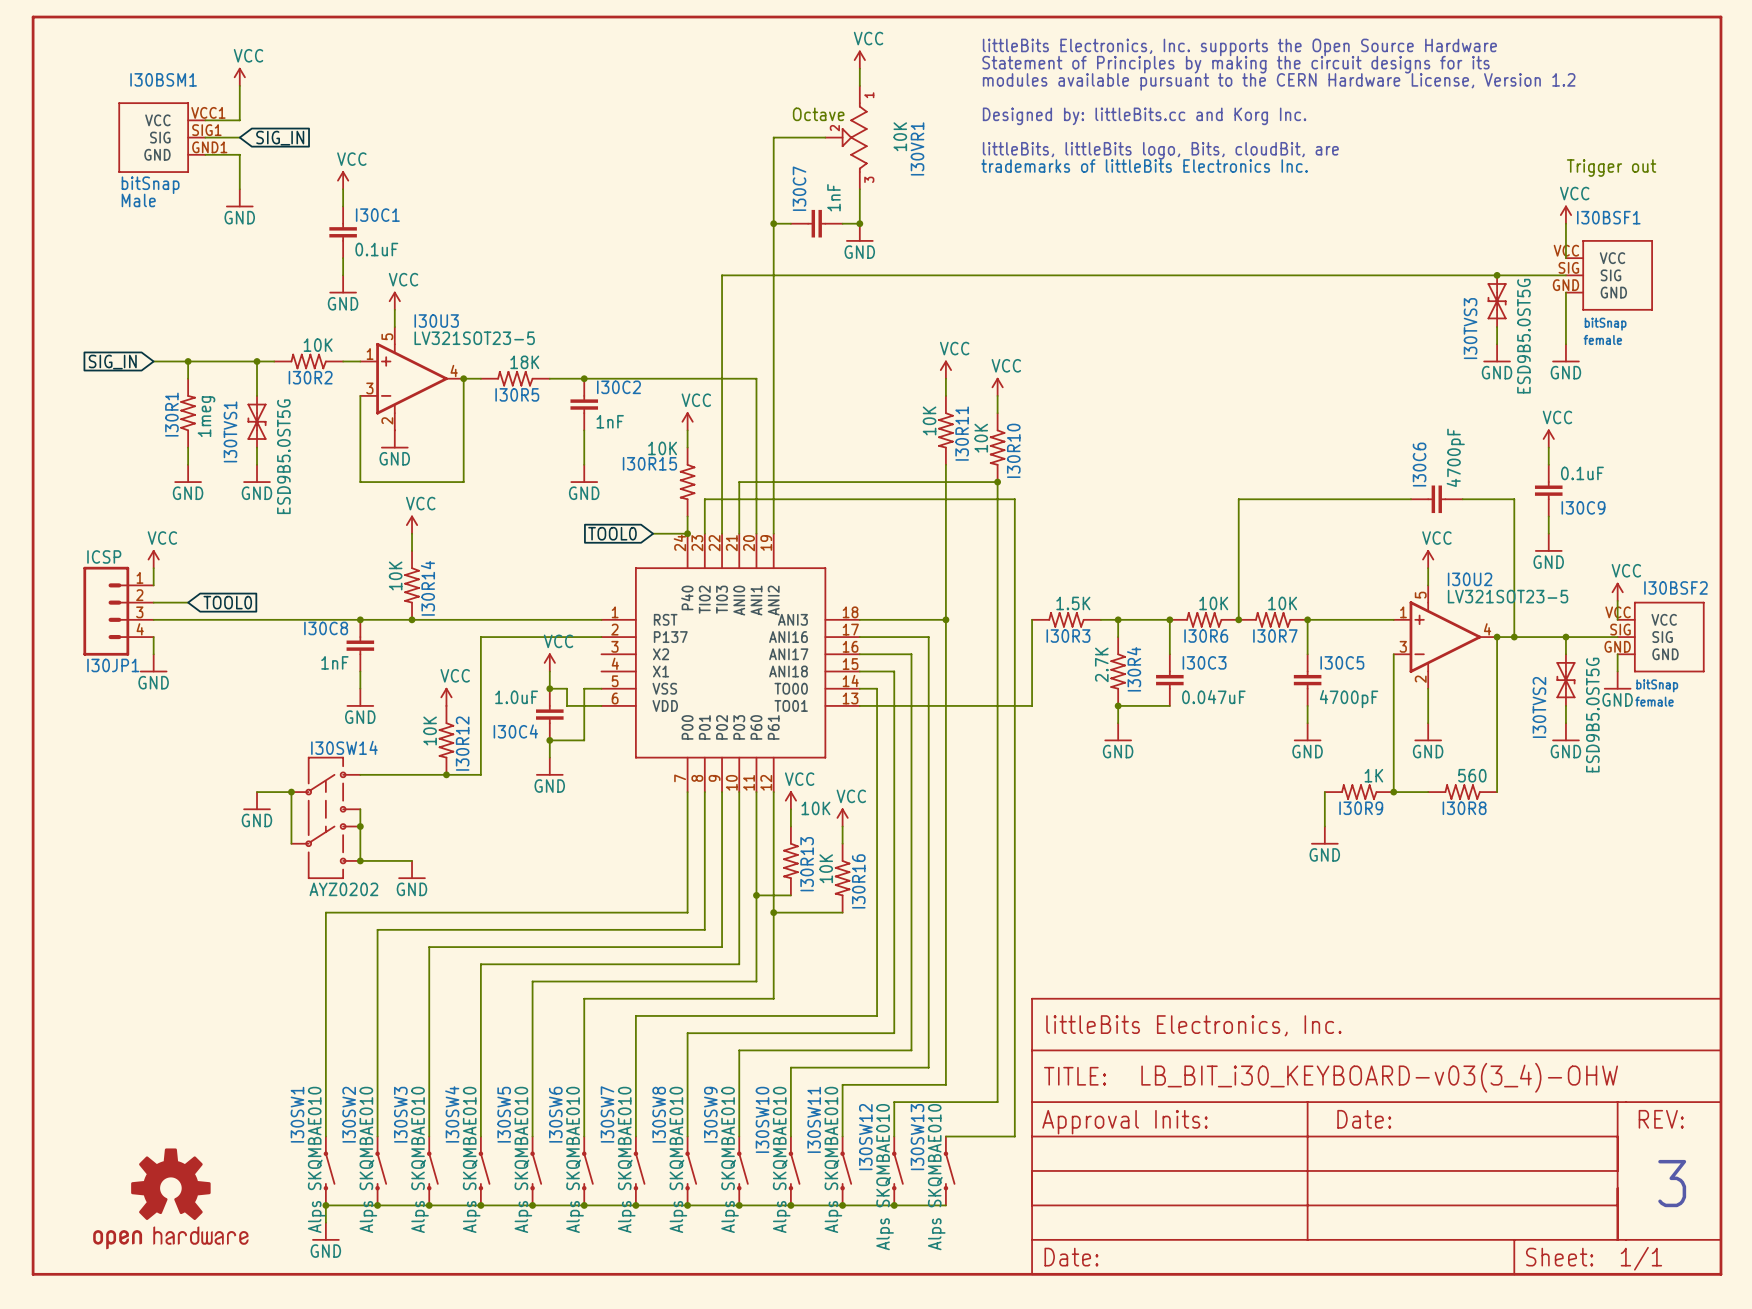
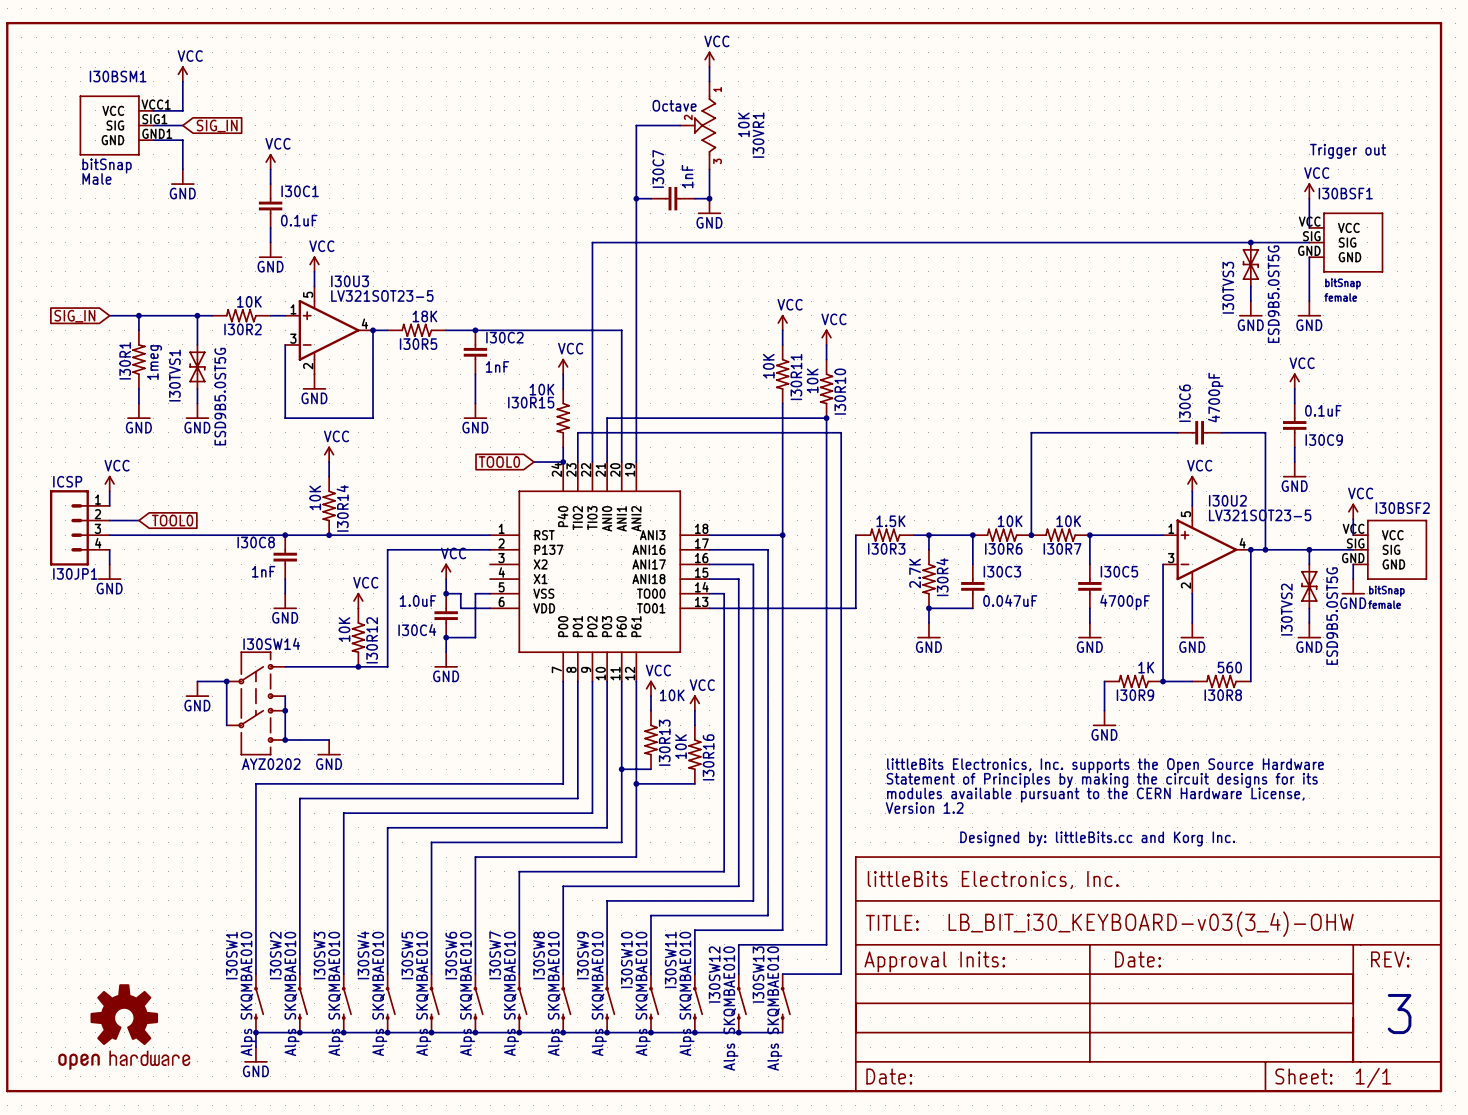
part: (1278, 105) -> none
part: none -> (1104, 802)

